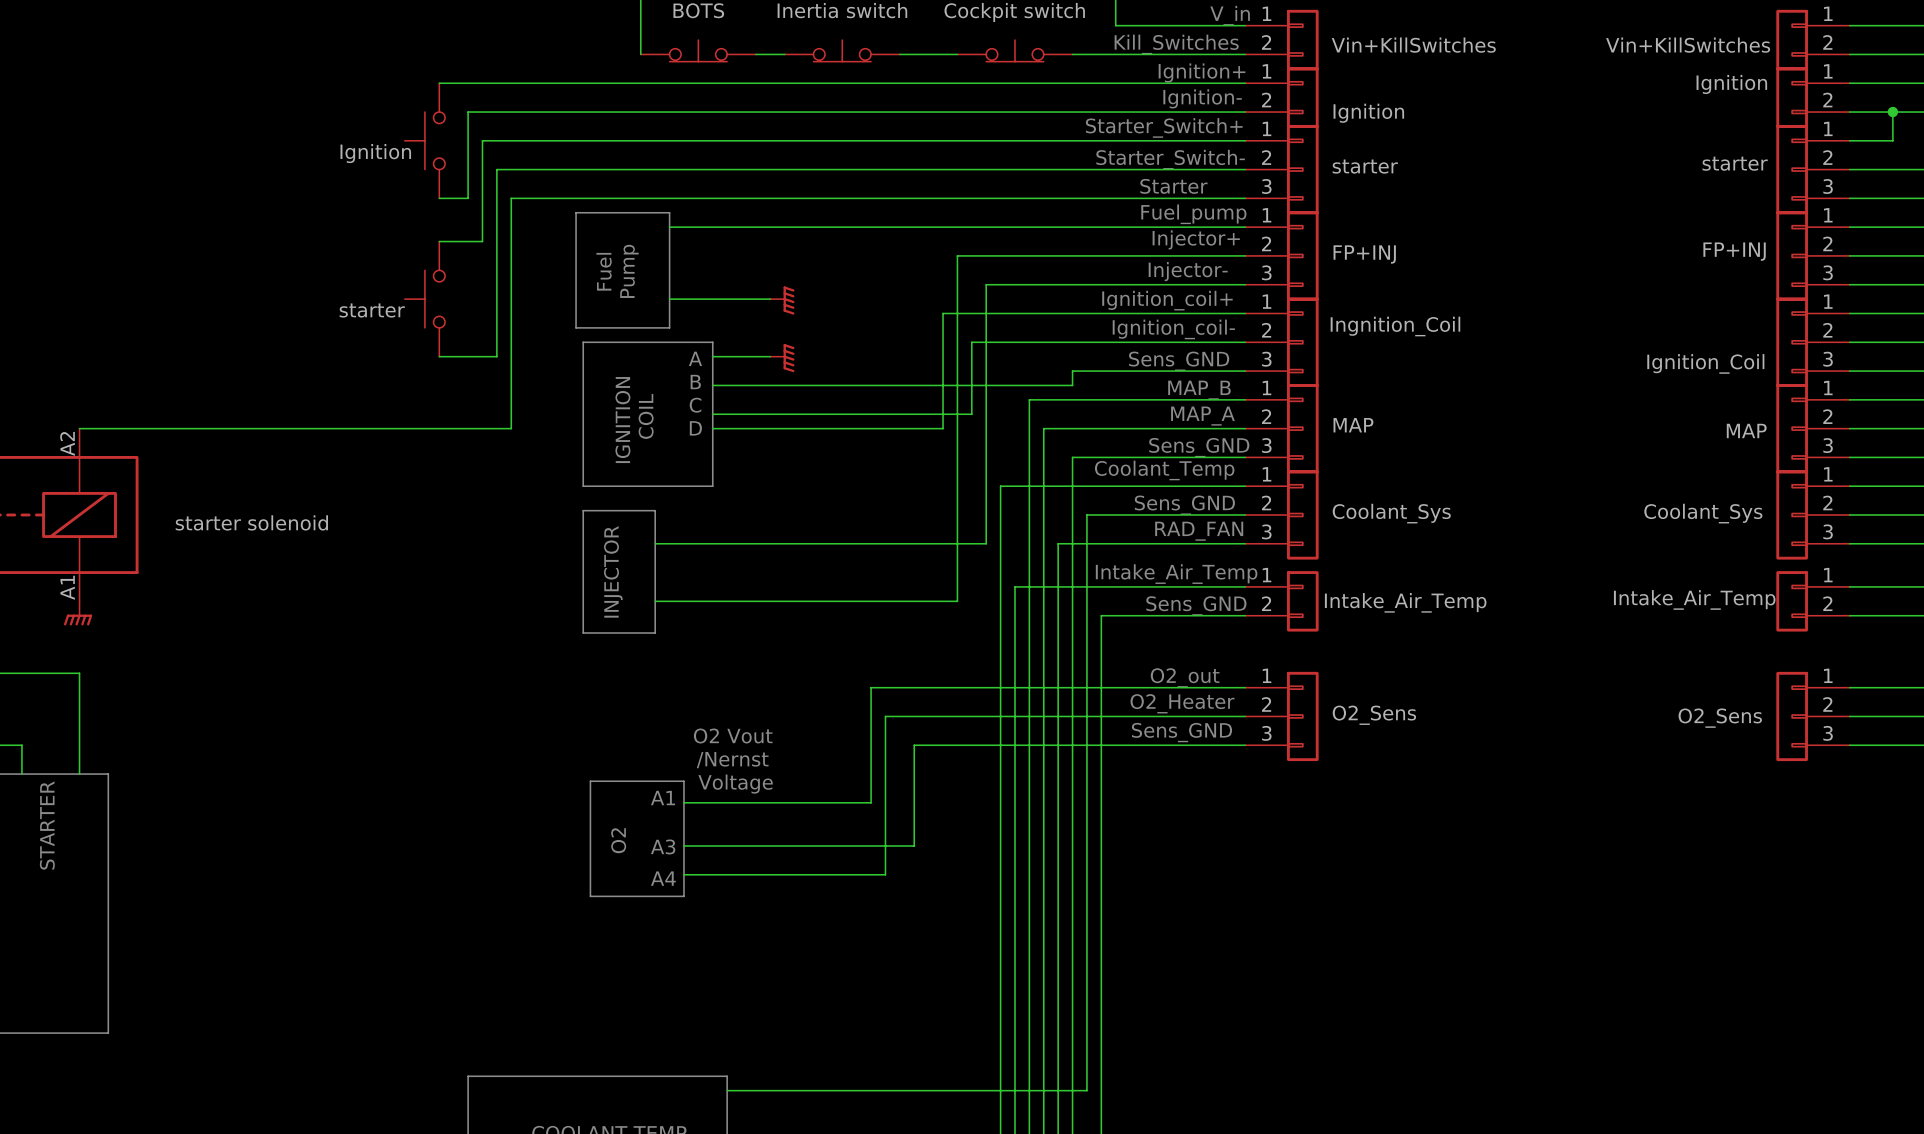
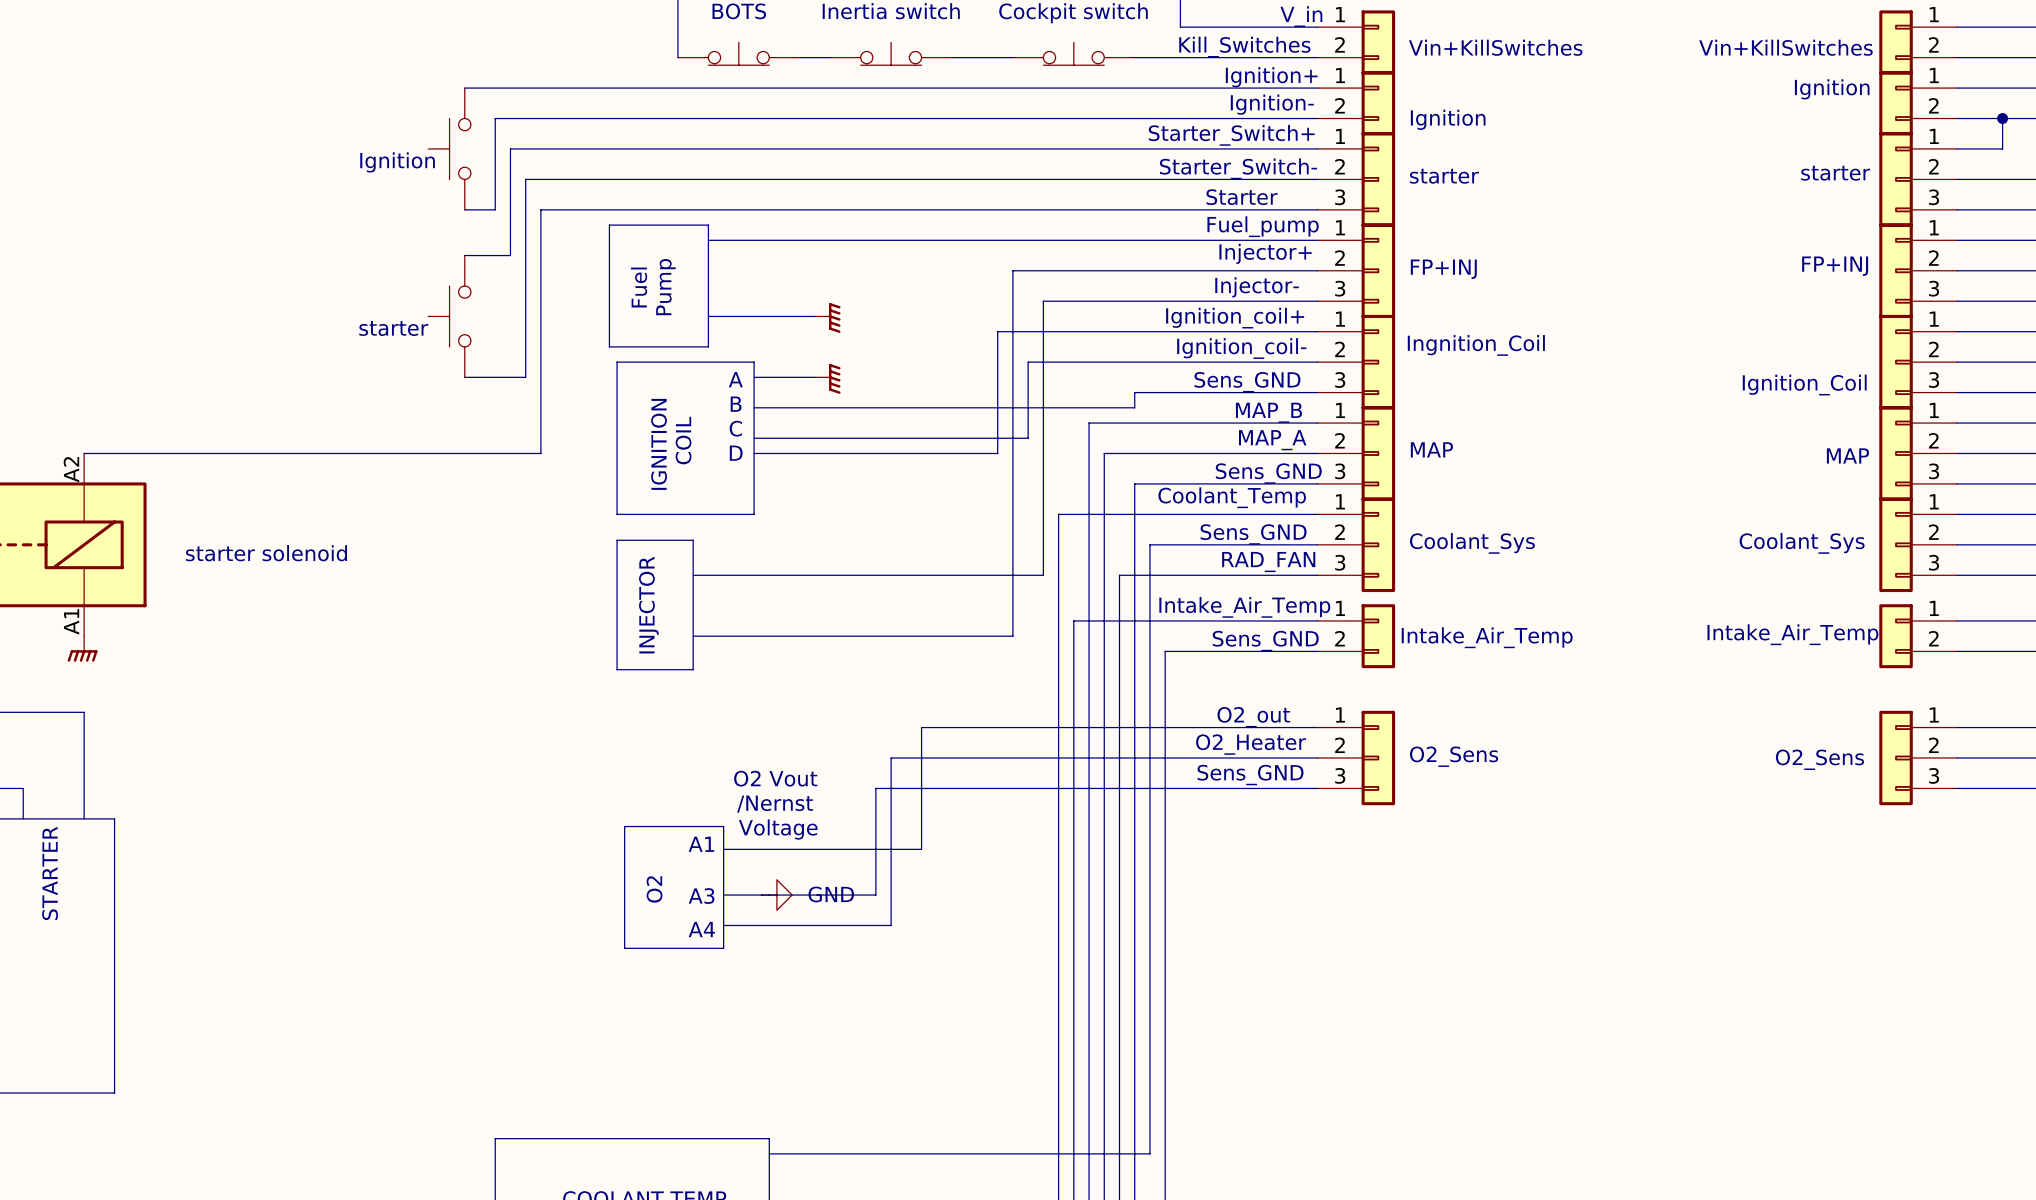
wire: (885, 716) (885, 874) (842, 874) -> (936, 758) (891, 758) (891, 925)
wire: (914, 745) (914, 846) (827, 846) -> (967, 788) (875, 788) (875, 895)
power symbol: none -> GND (776, 895)

